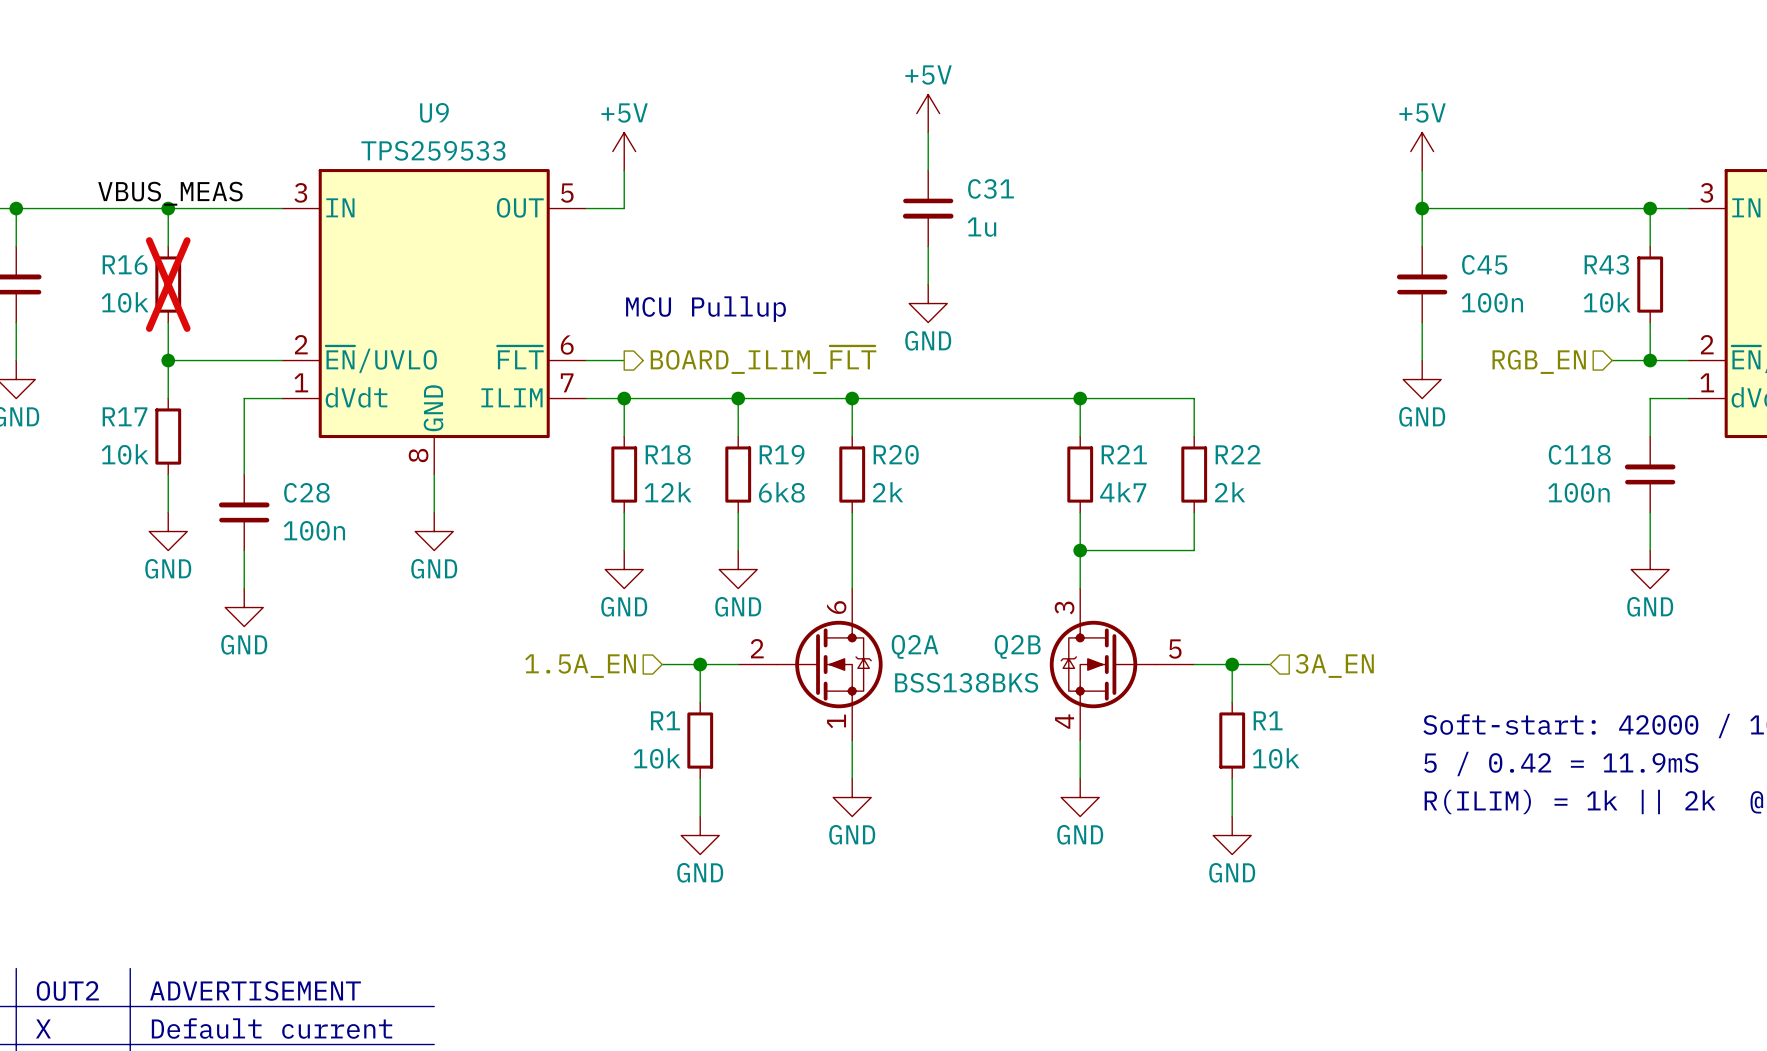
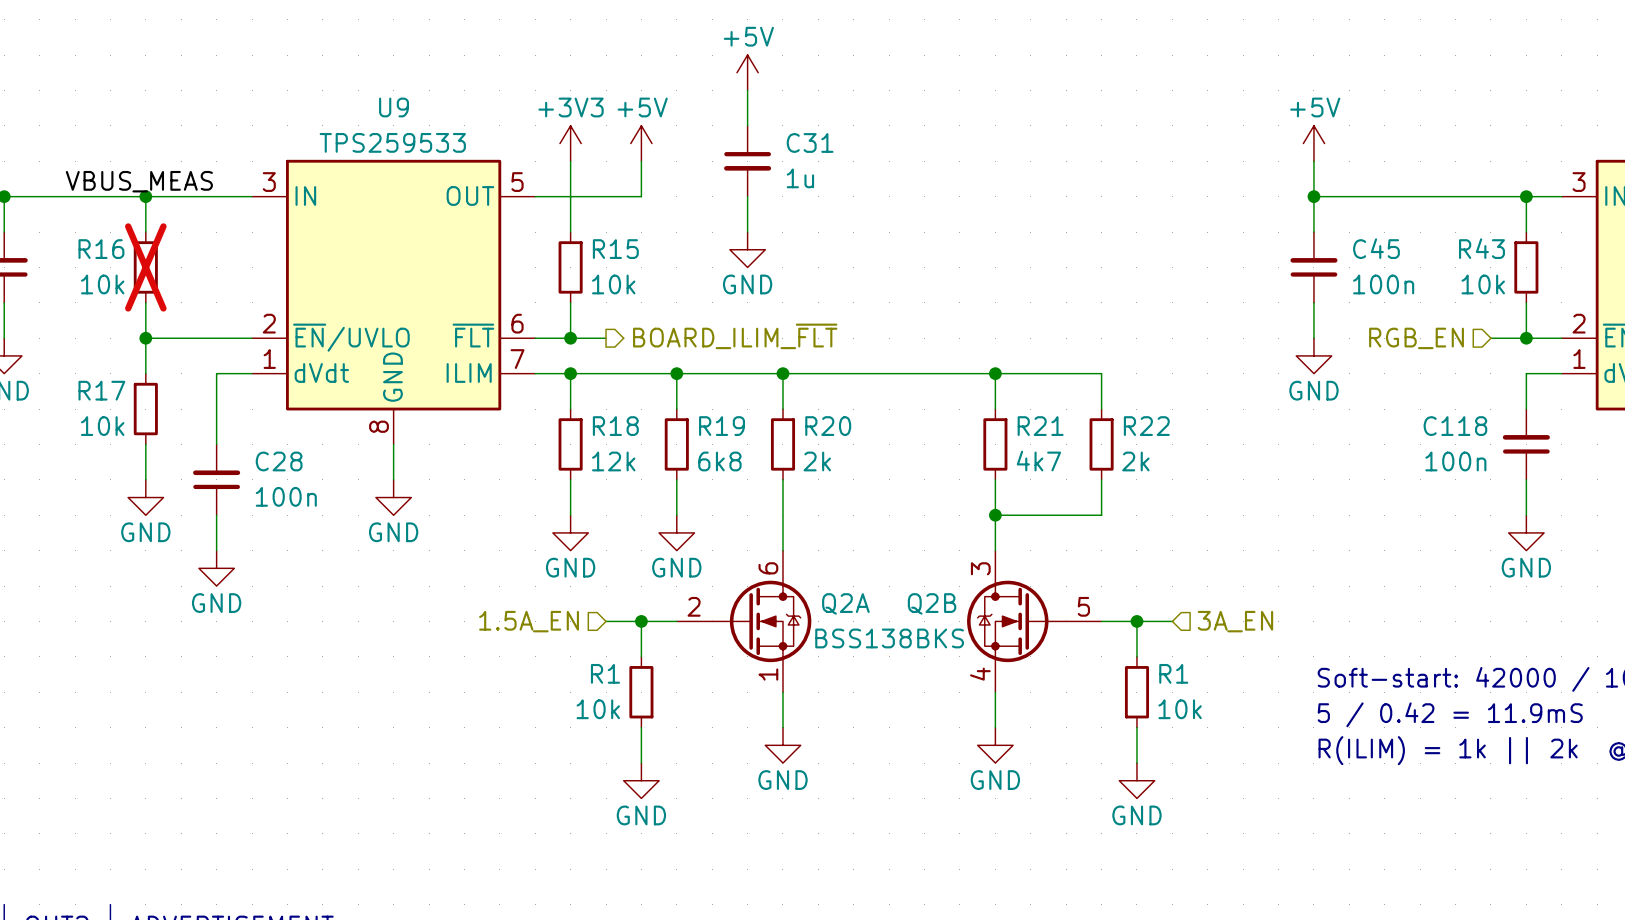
power symbol: none -> +5V (747, 72)
power symbol: +5V (928, 113) -> none
wire: (928, 132) (928, 170) -> (747, 90) (747, 125)
power symbol: +5V (624, 151) -> +3V3 (570, 143)
power symbol: none -> +5V (641, 143)
wire: none -> (641, 161) (641, 196) (570, 196) (570, 232)
C31 position: (928, 208) -> (747, 161)
wire: (928, 246) (928, 284) -> (747, 196) (747, 232)
R15: none -> 10k (570, 267)
power symbol position: GND (928, 303) -> GND (747, 249)
text: MCU Pullup (705, 309) -> none
wire: none -> (570, 302) (570, 338) (606, 338)
hierarchical label position: BOARD_ILIM_~{FLT} (763, 359) -> BOARD_ILIM_~{FLT} (735, 336)
junction: none -> (570, 338)

